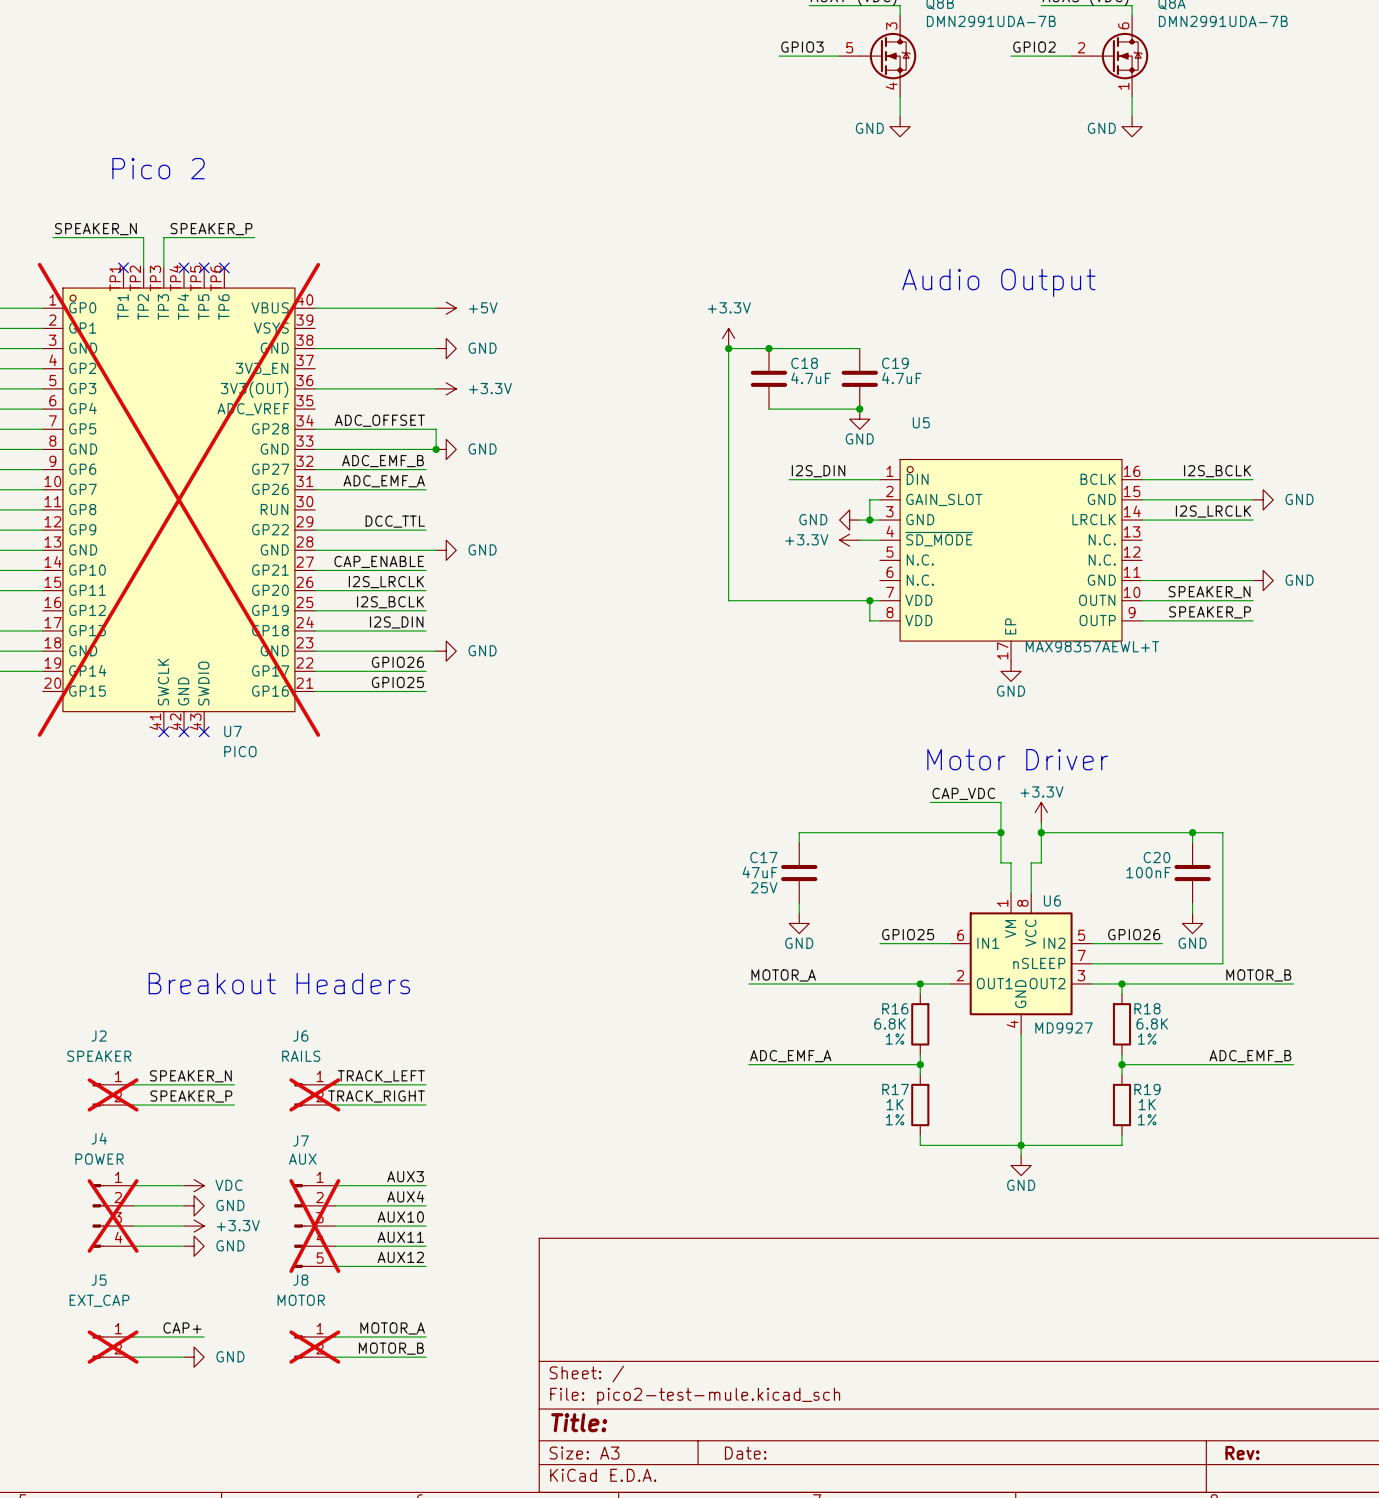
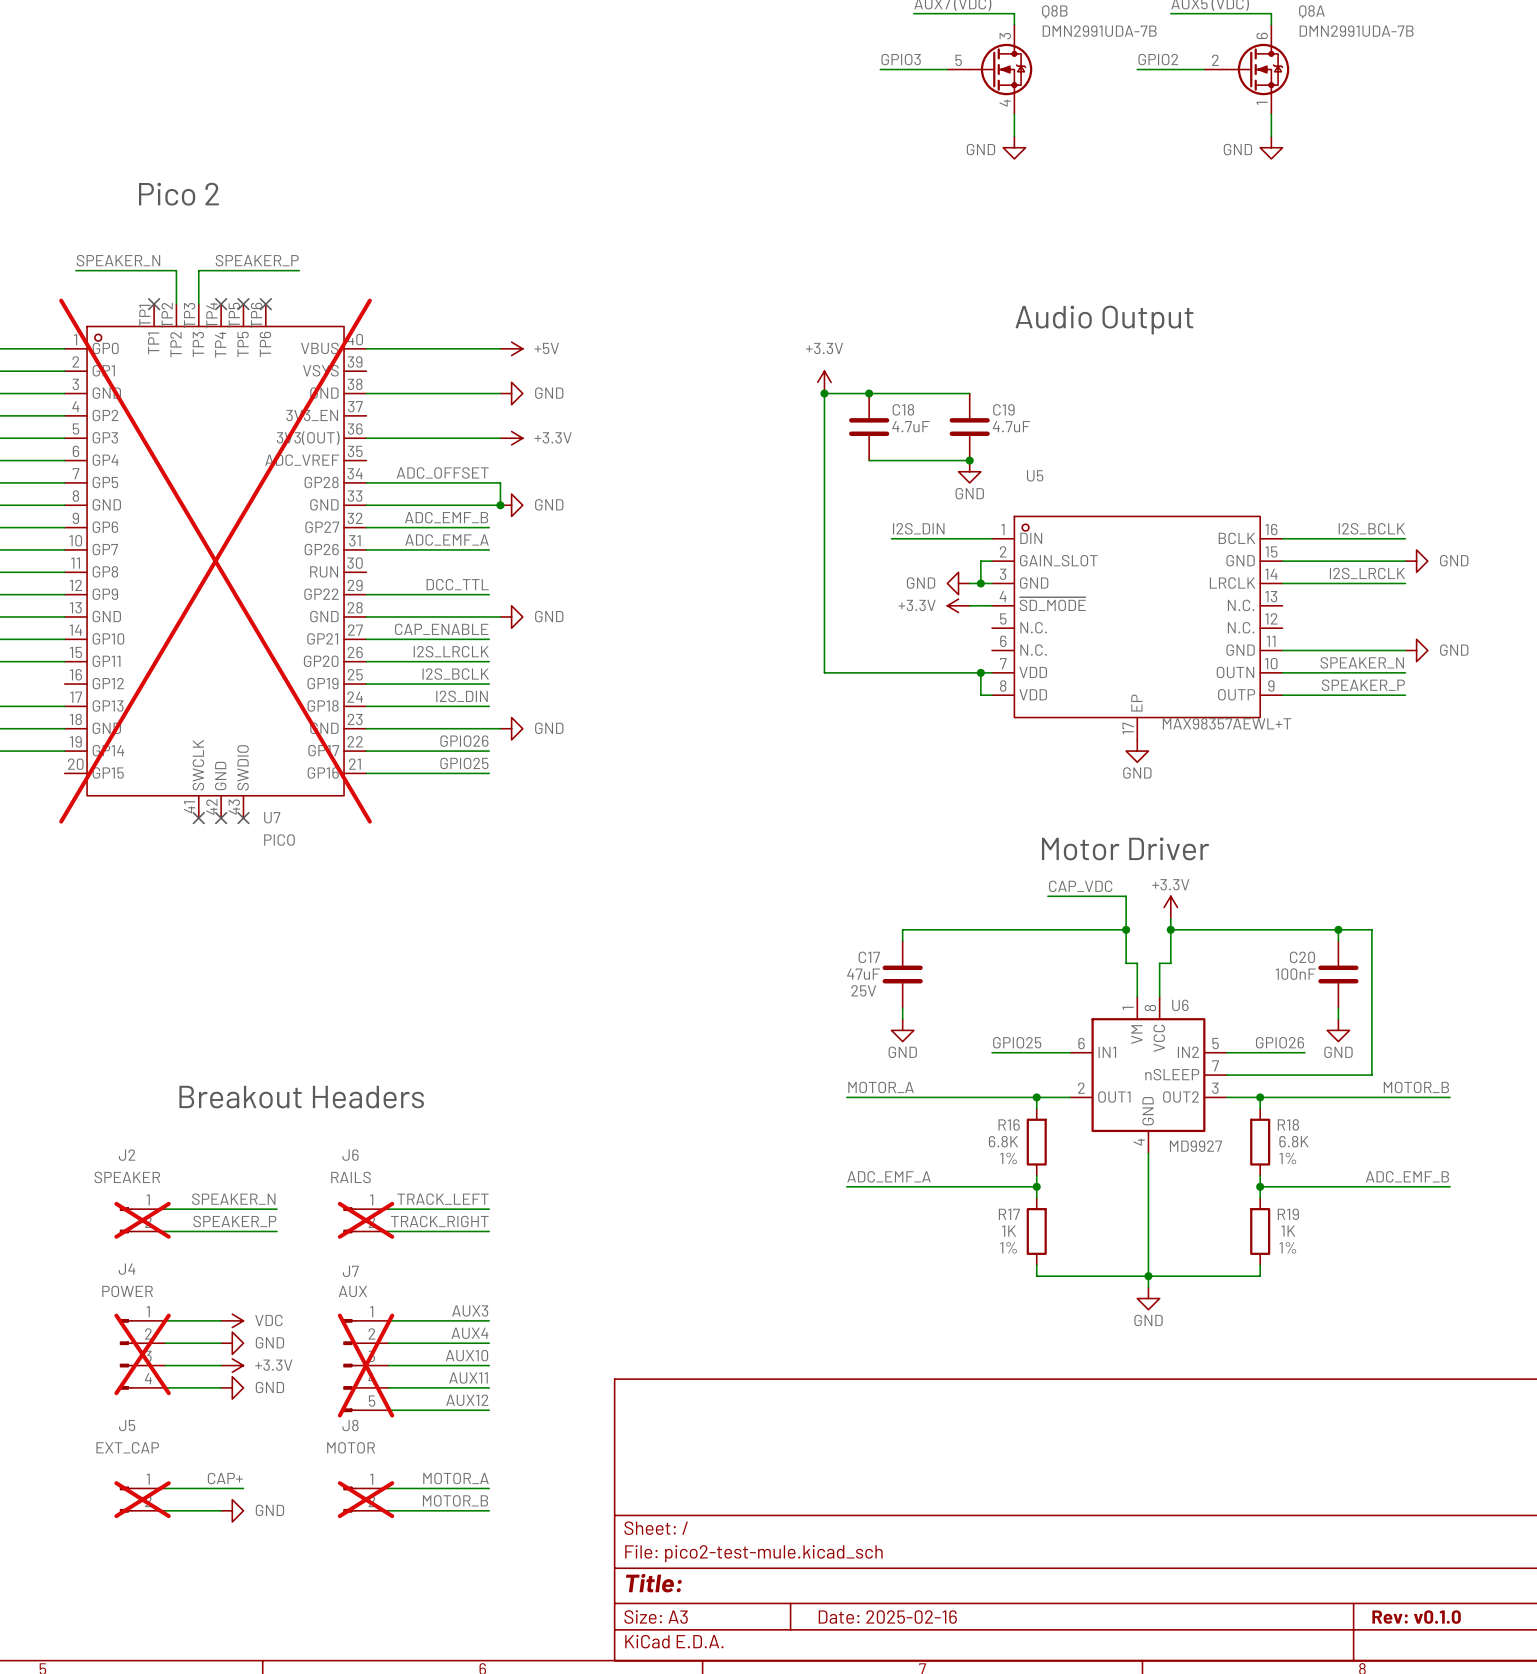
title block: Date: (745, 1453) -> Date: 2025-02-16 (887, 1617)
title block: Rev: (1242, 1453) -> Rev: v0.1.0 (1416, 1617)

